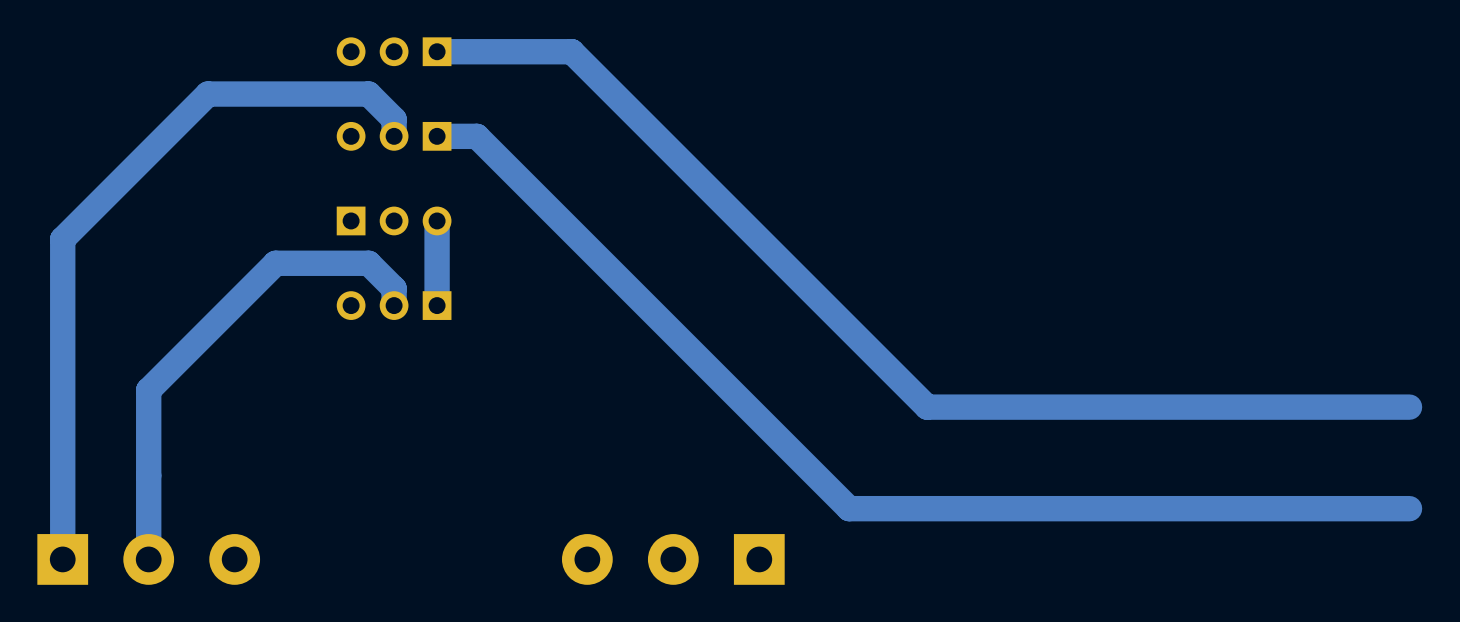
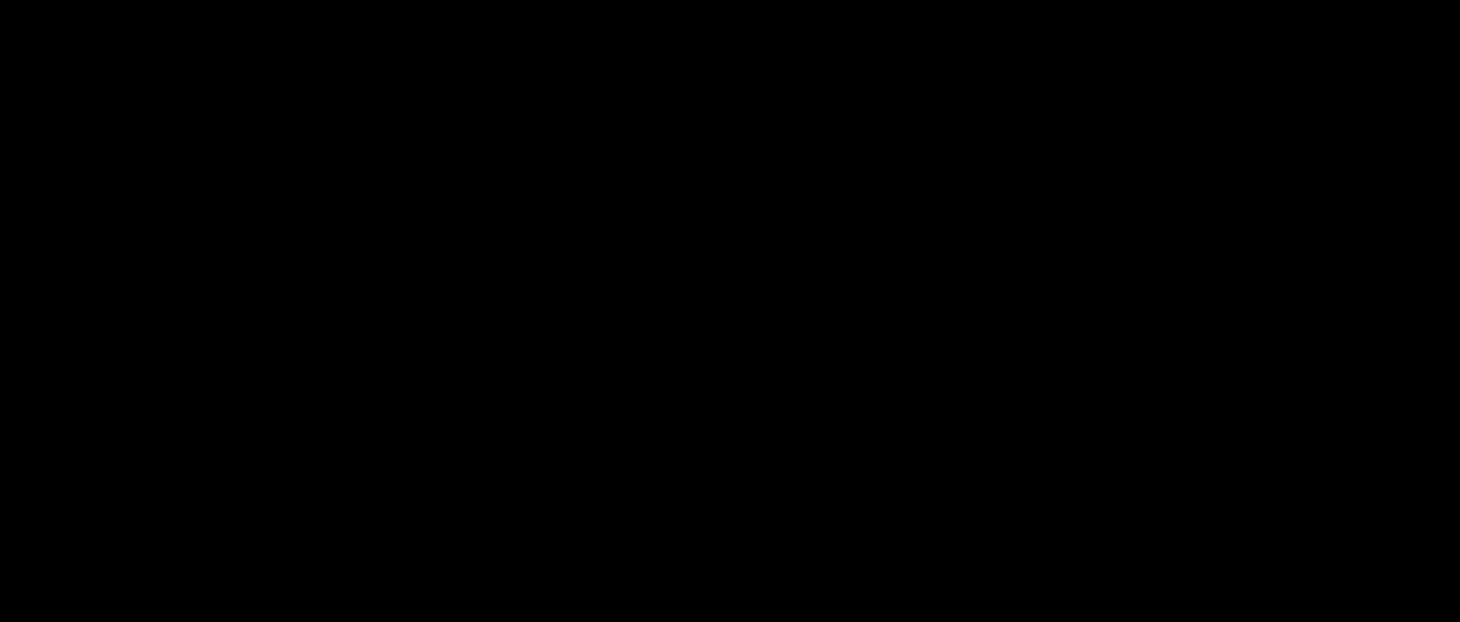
part: (394, 51) -> none
track: (437, 51) (571, 51) (927, 407) (1409, 407) -> none
track: (394, 136) (394, 119) (368, 94) (207, 94) (62, 239) (62, 559) -> none
part: (394, 136) -> none
track: (437, 136) (476, 136) (849, 508) (1409, 508) -> none
part: (394, 220) -> none
track: (437, 220) (437, 305) -> none
track: (394, 305) (394, 288) (368, 263) (275, 263) (148, 390) (148, 559) -> none
part: (394, 305) -> none
part: (148, 559) -> none
part: (673, 559) -> none

